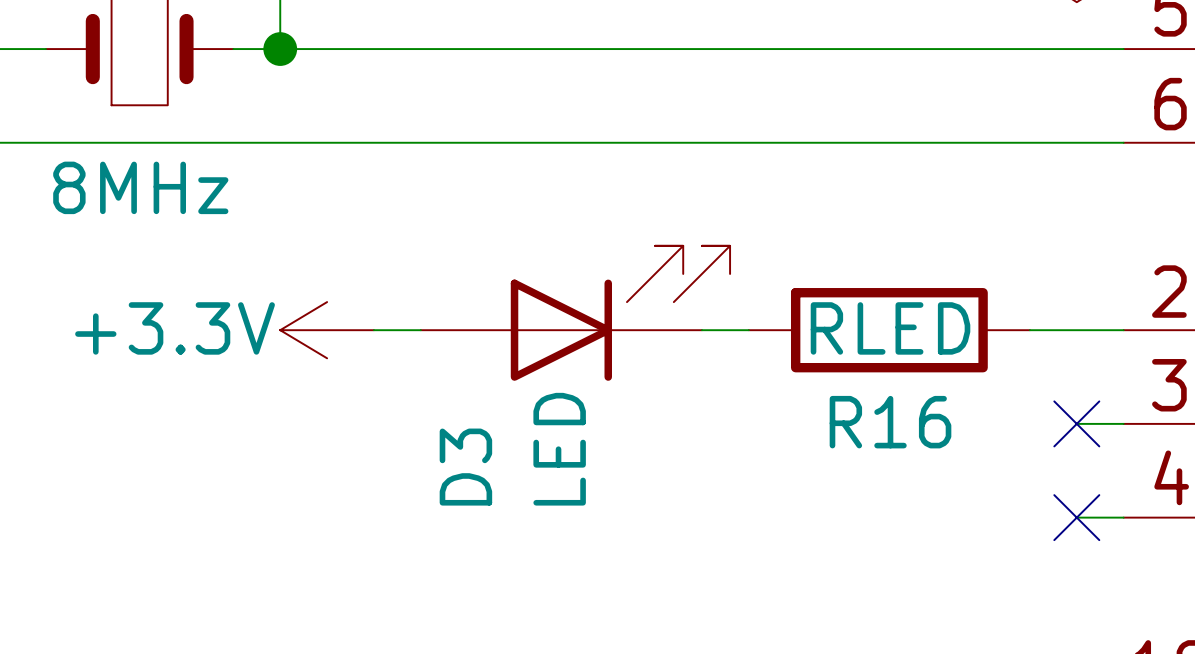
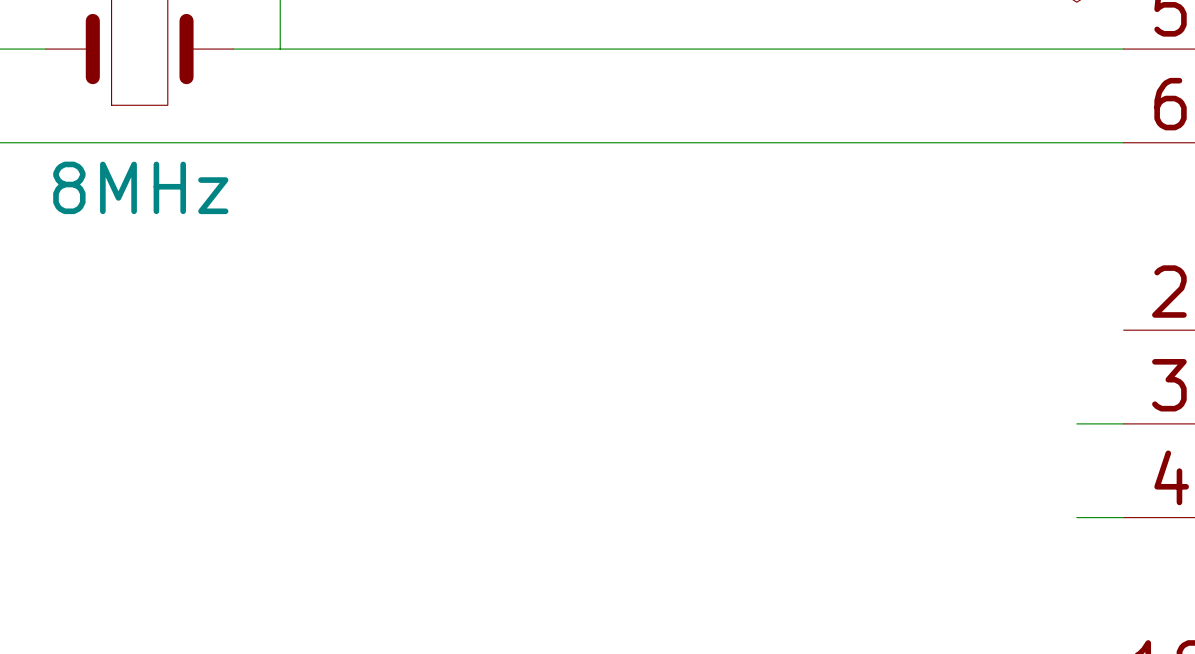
junction: (280, 49) -> none
D3: LED (575, 313) -> none
power symbol: +3.3V (327, 330) -> none
wire: (373, 330) (420, 330) -> none
wire: (701, 330) (748, 330) -> none
R16: RLED (889, 330) -> none
wire: (1029, 330) (1123, 330) -> none
no-connect mark: (1076, 423) -> none
no-connect mark: (1076, 517) -> none

